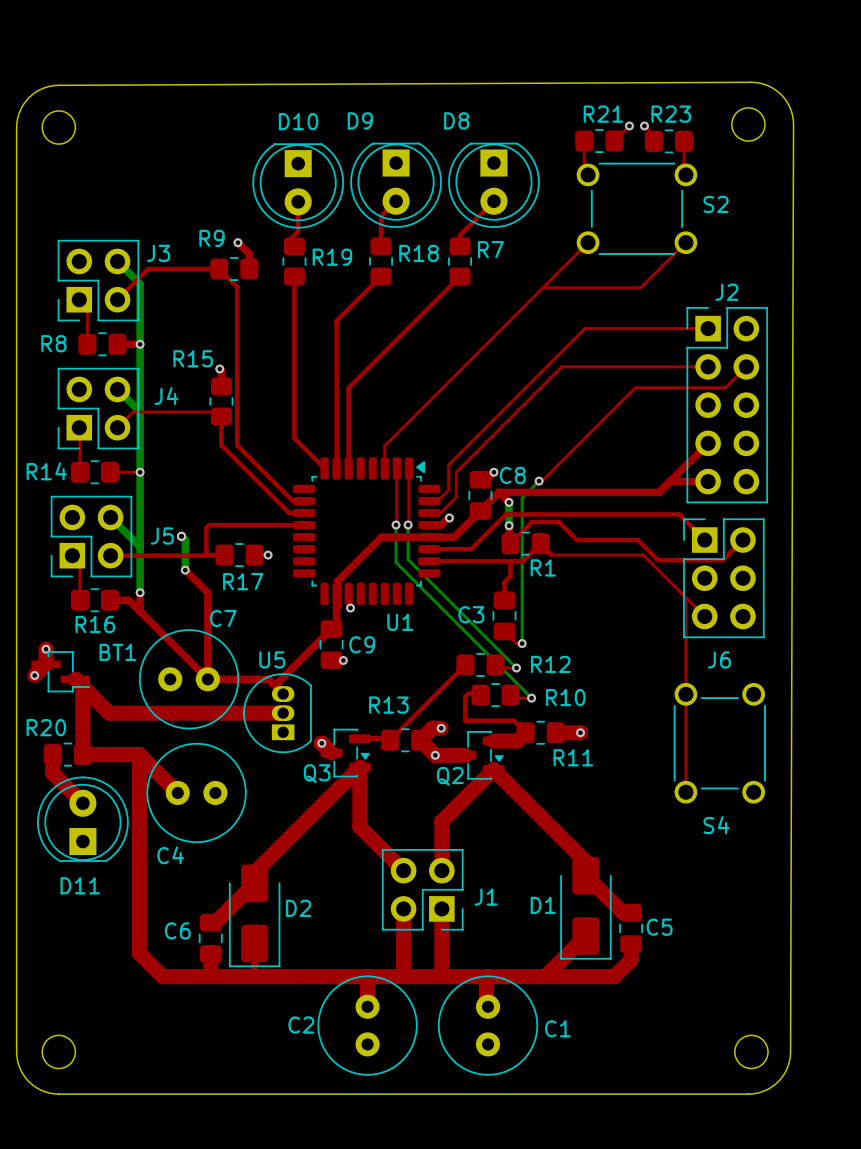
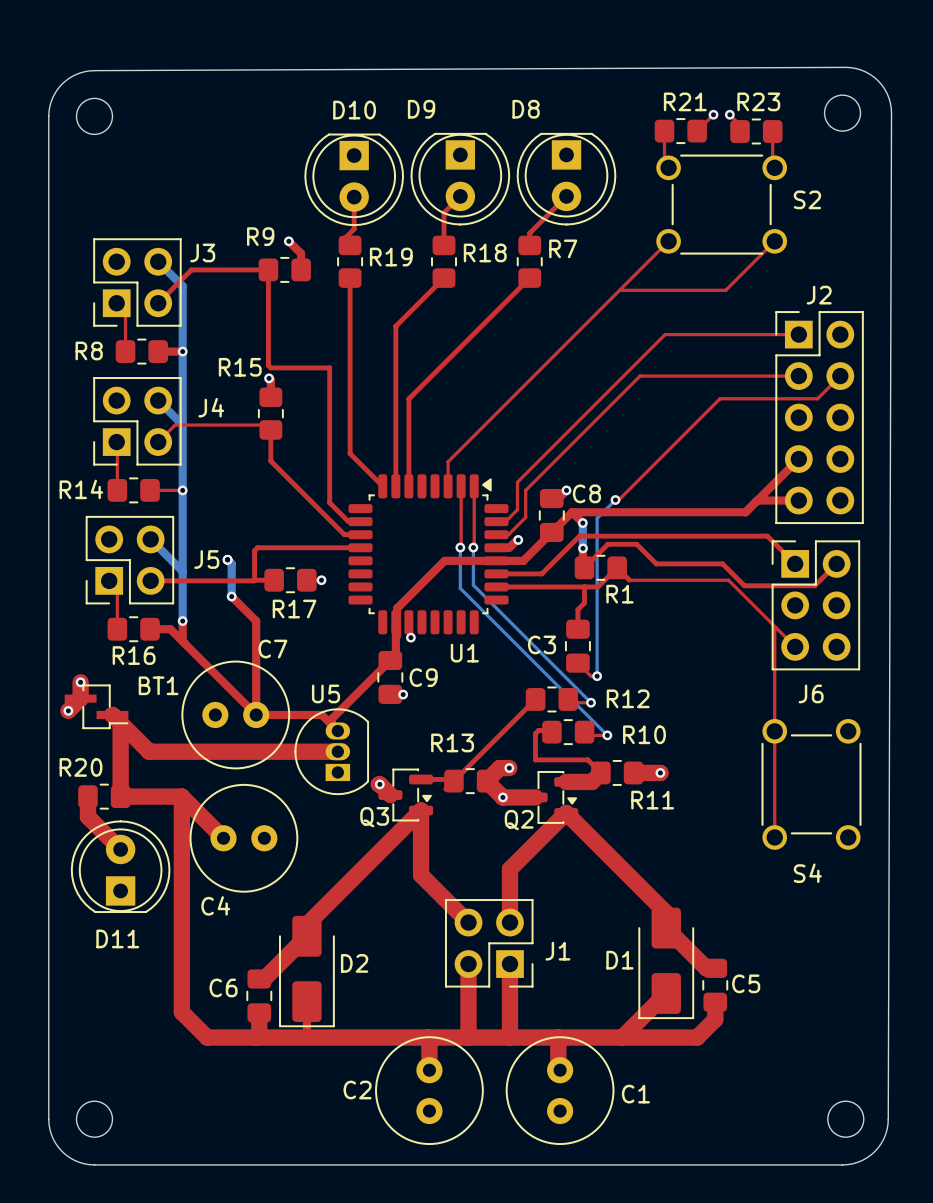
top track: (219, 269) (237, 287) (237, 445) (275, 483) -> (268, 269) (268, 365) (270, 367) (329, 367) (329, 502)

